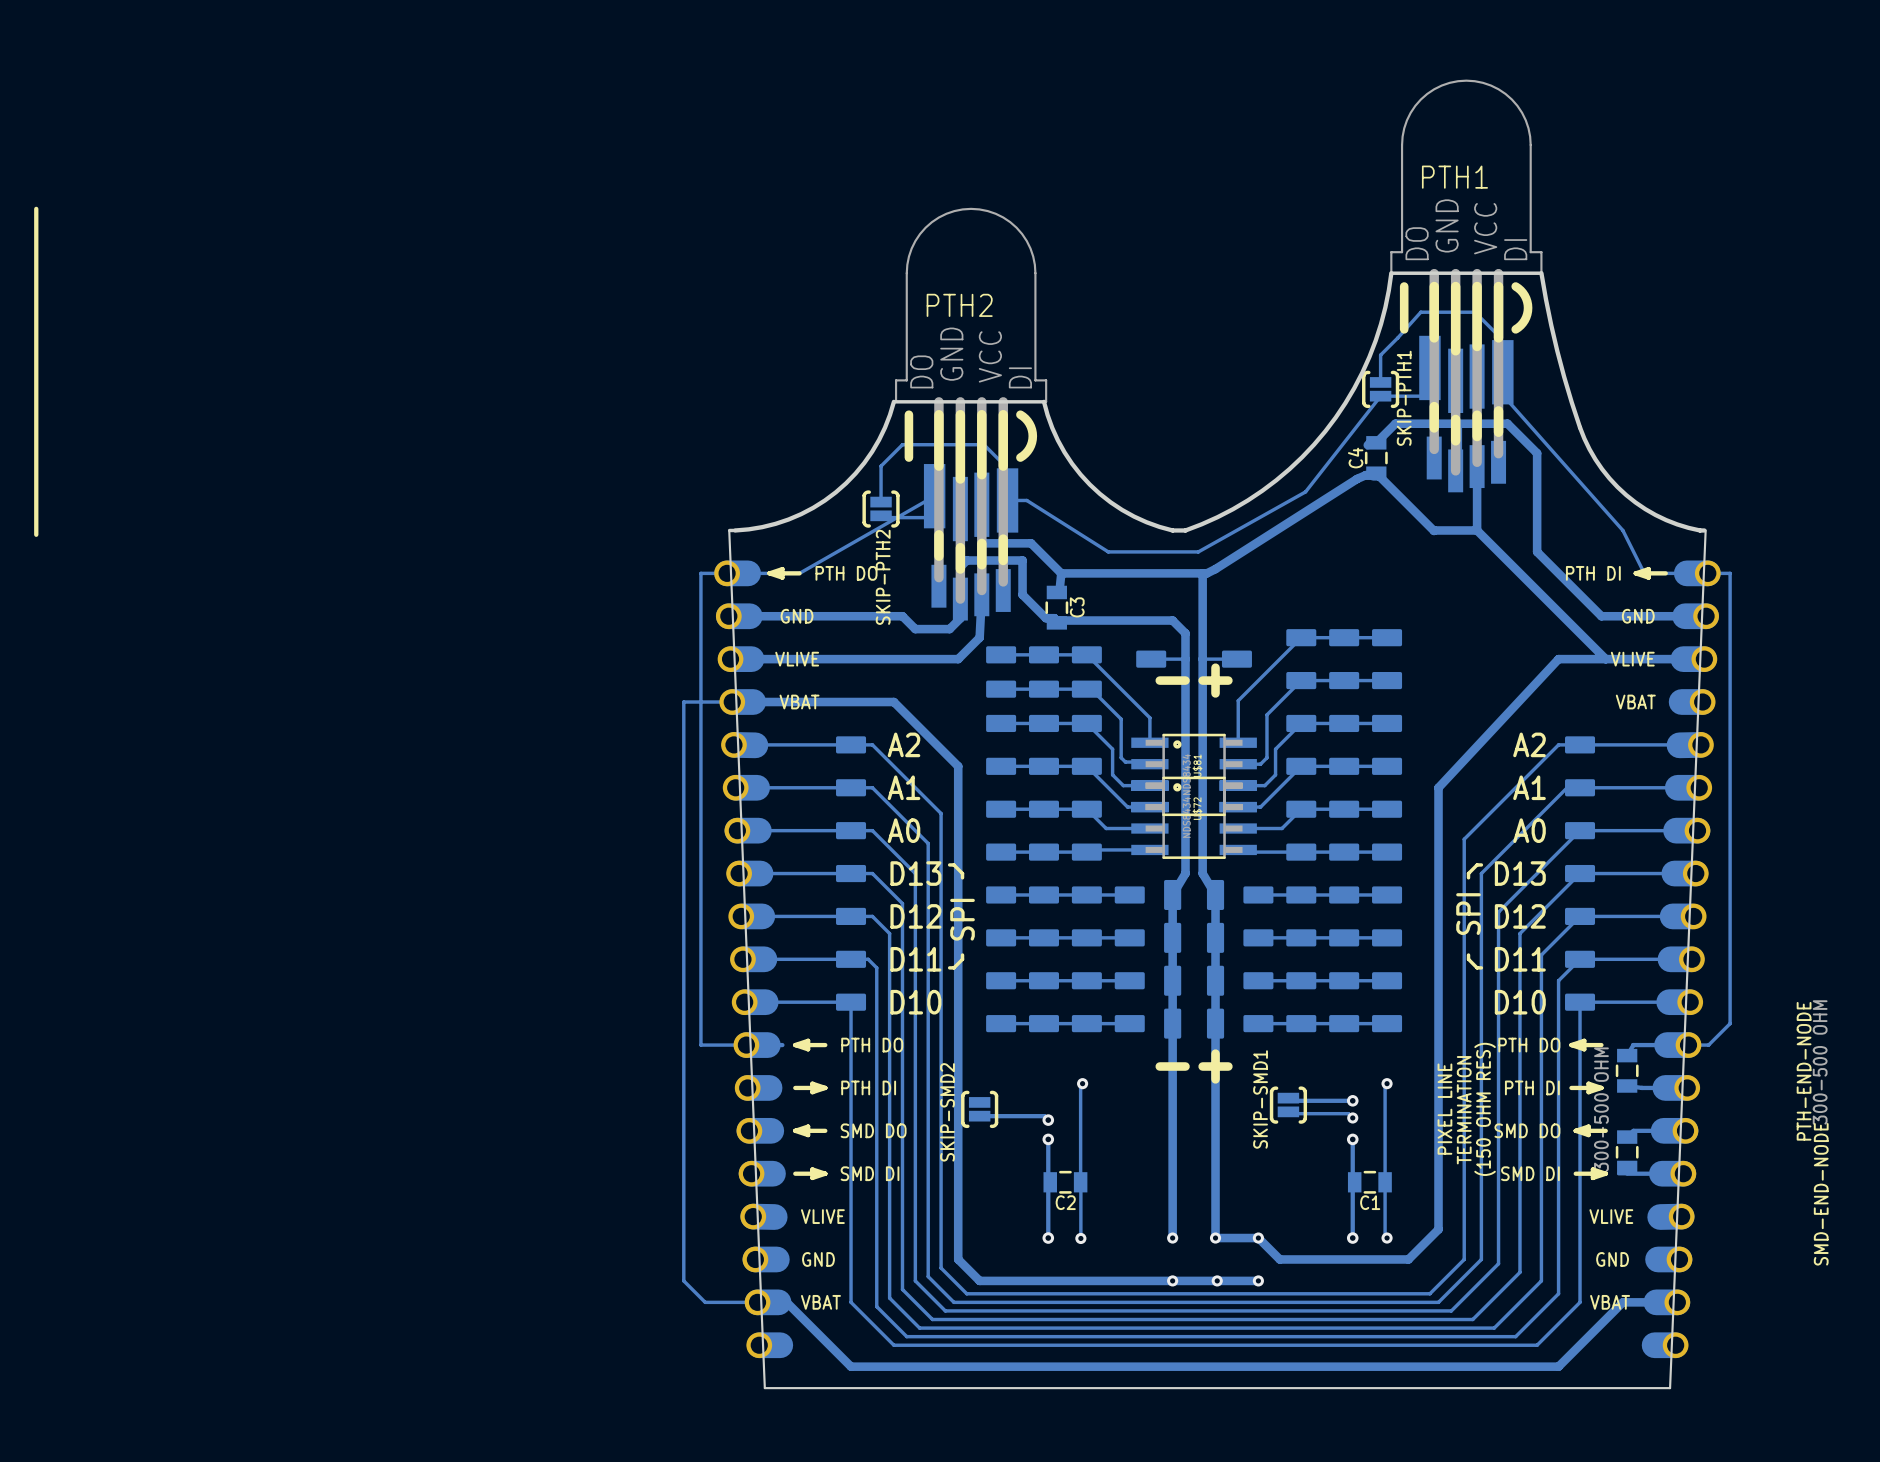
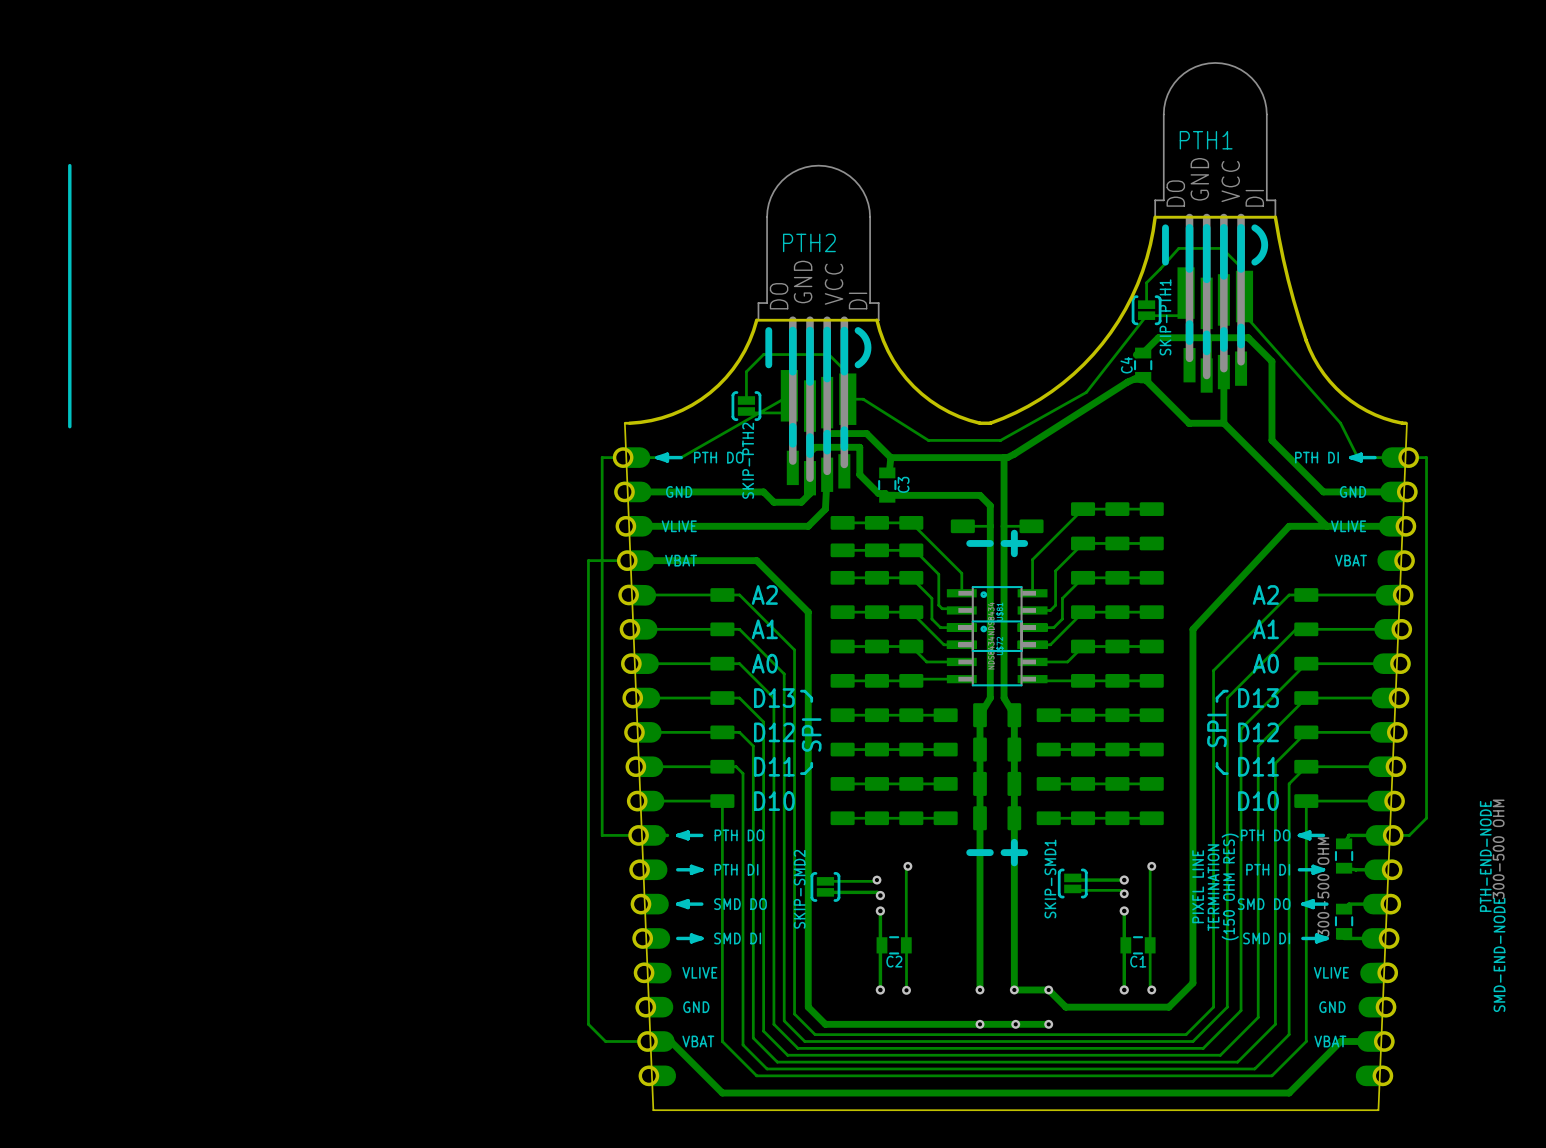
track: none -> (876, 880) (825, 881)
via: none -> (876, 880)

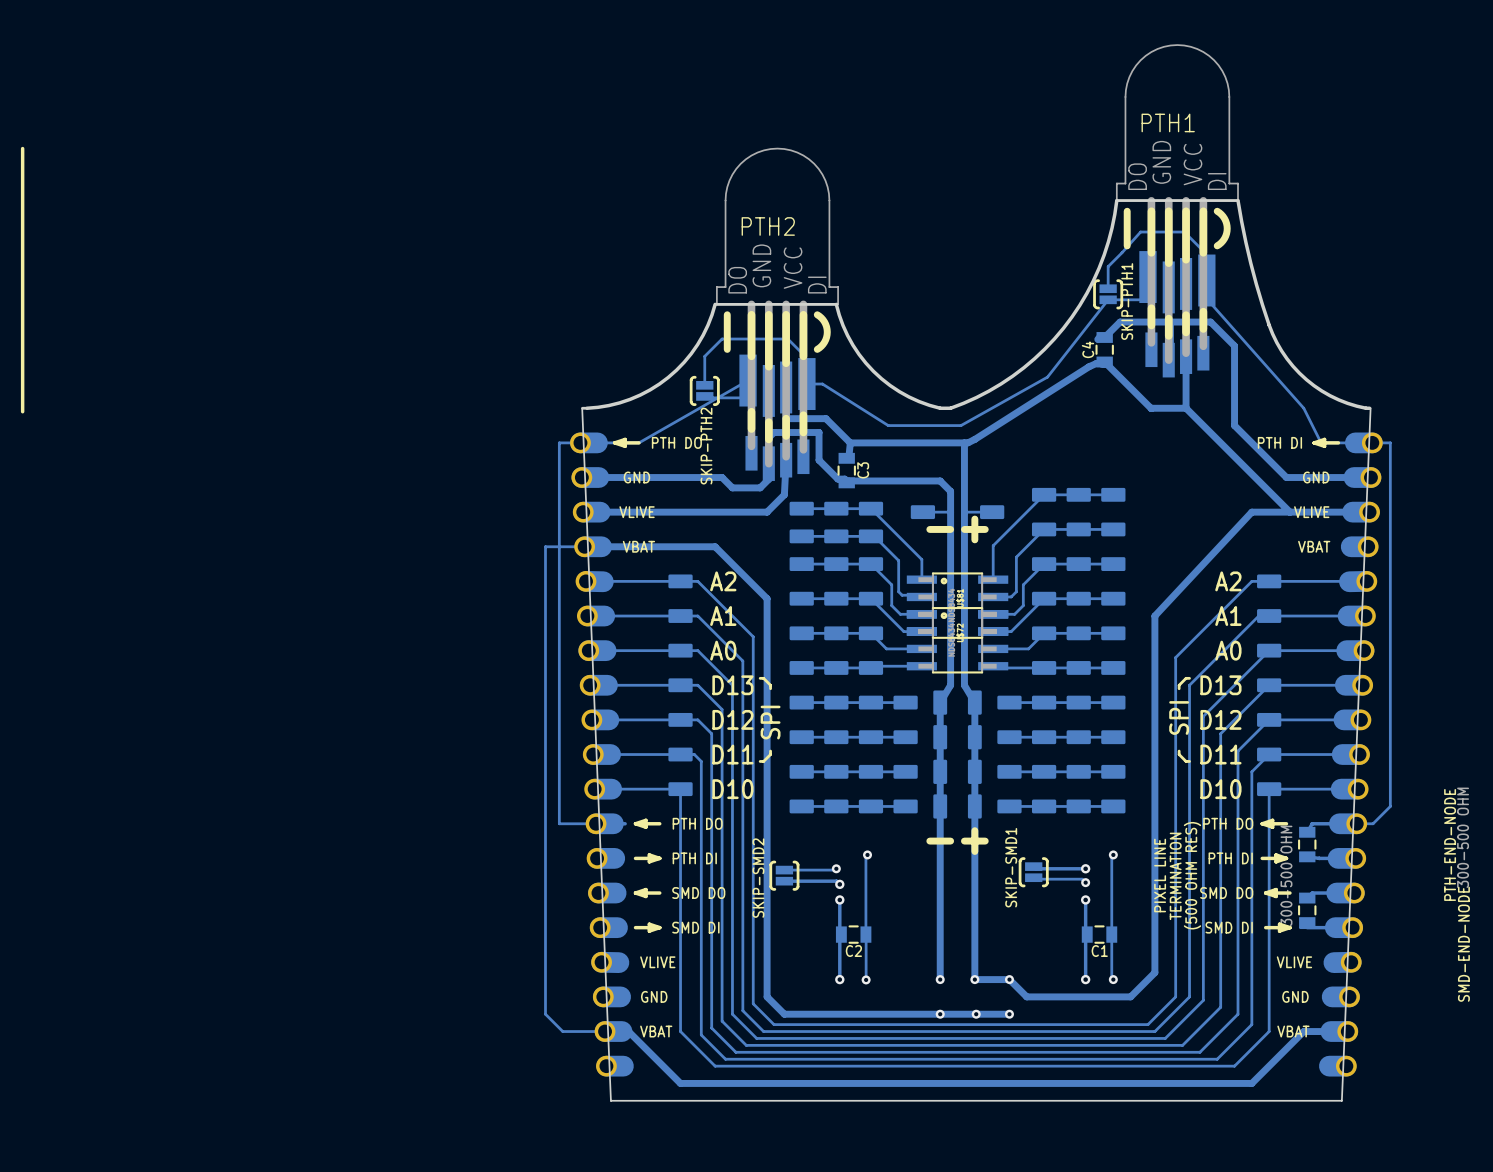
text: (150 OHM RES) (1230, 886) -> (500 OHM RES) (1192, 875)

